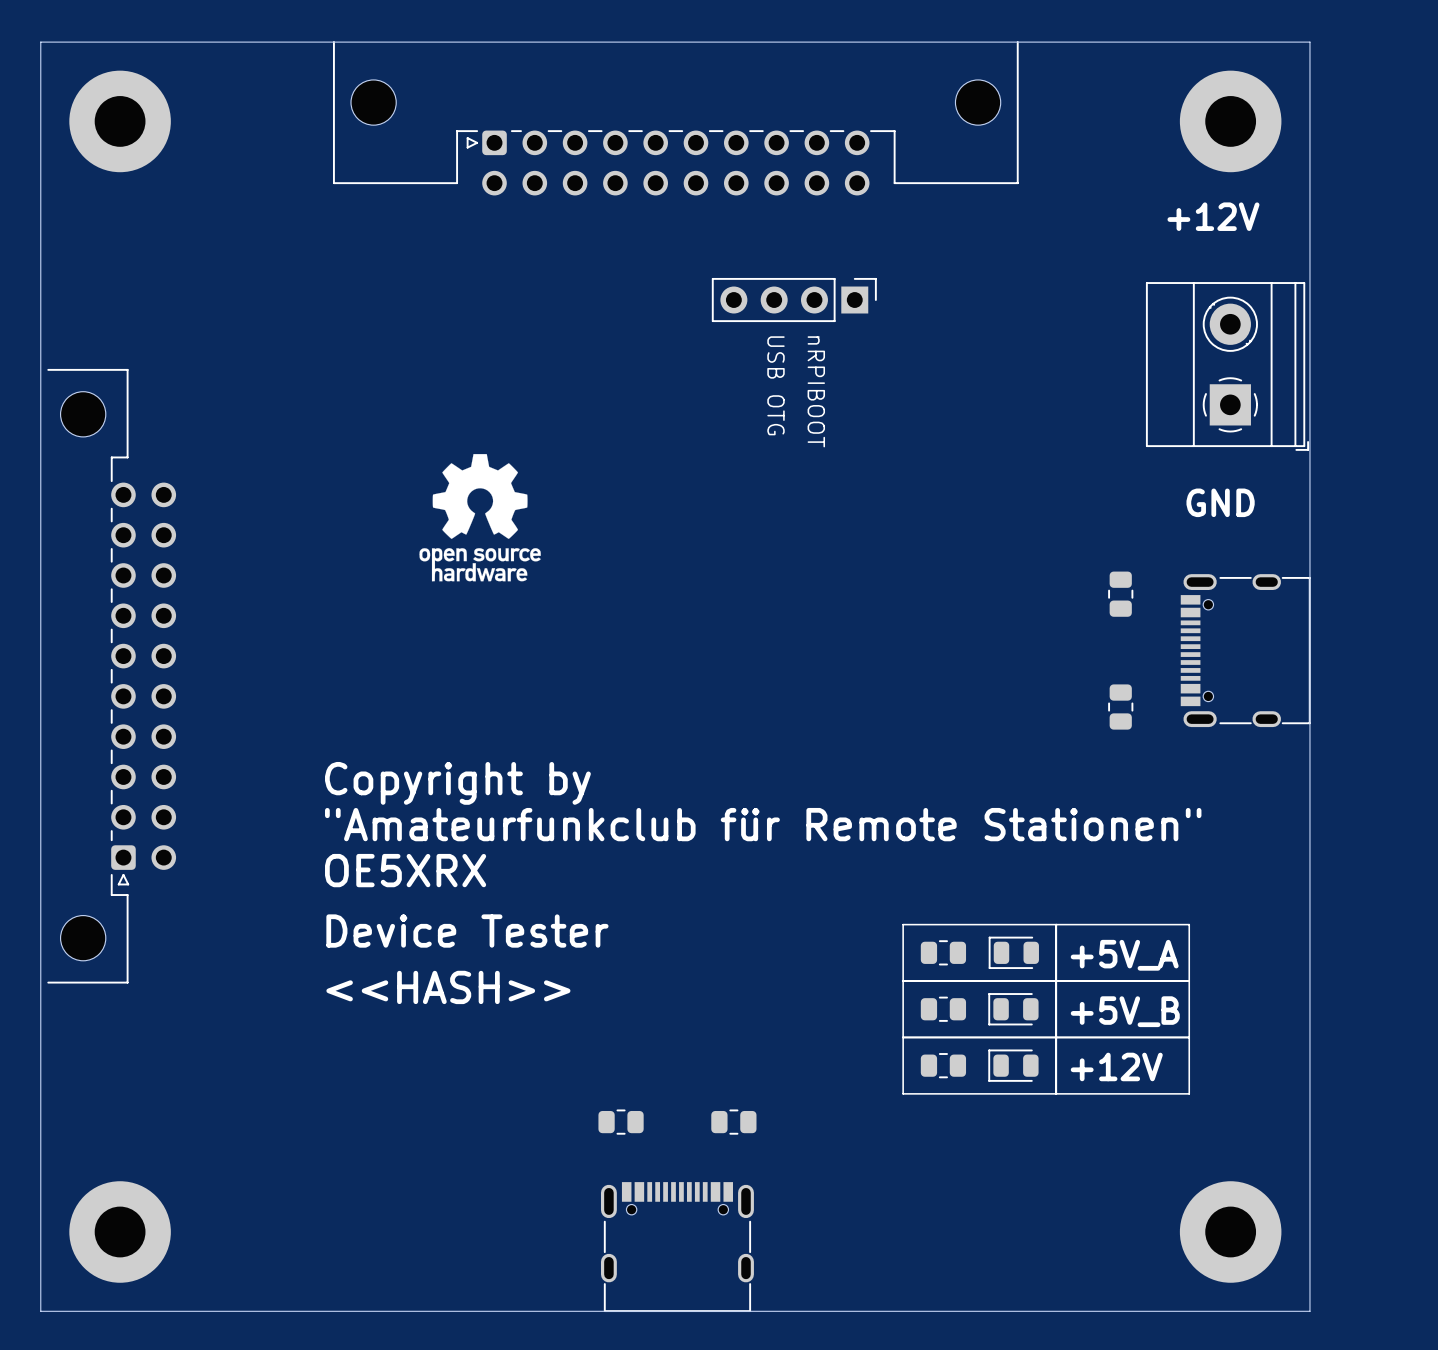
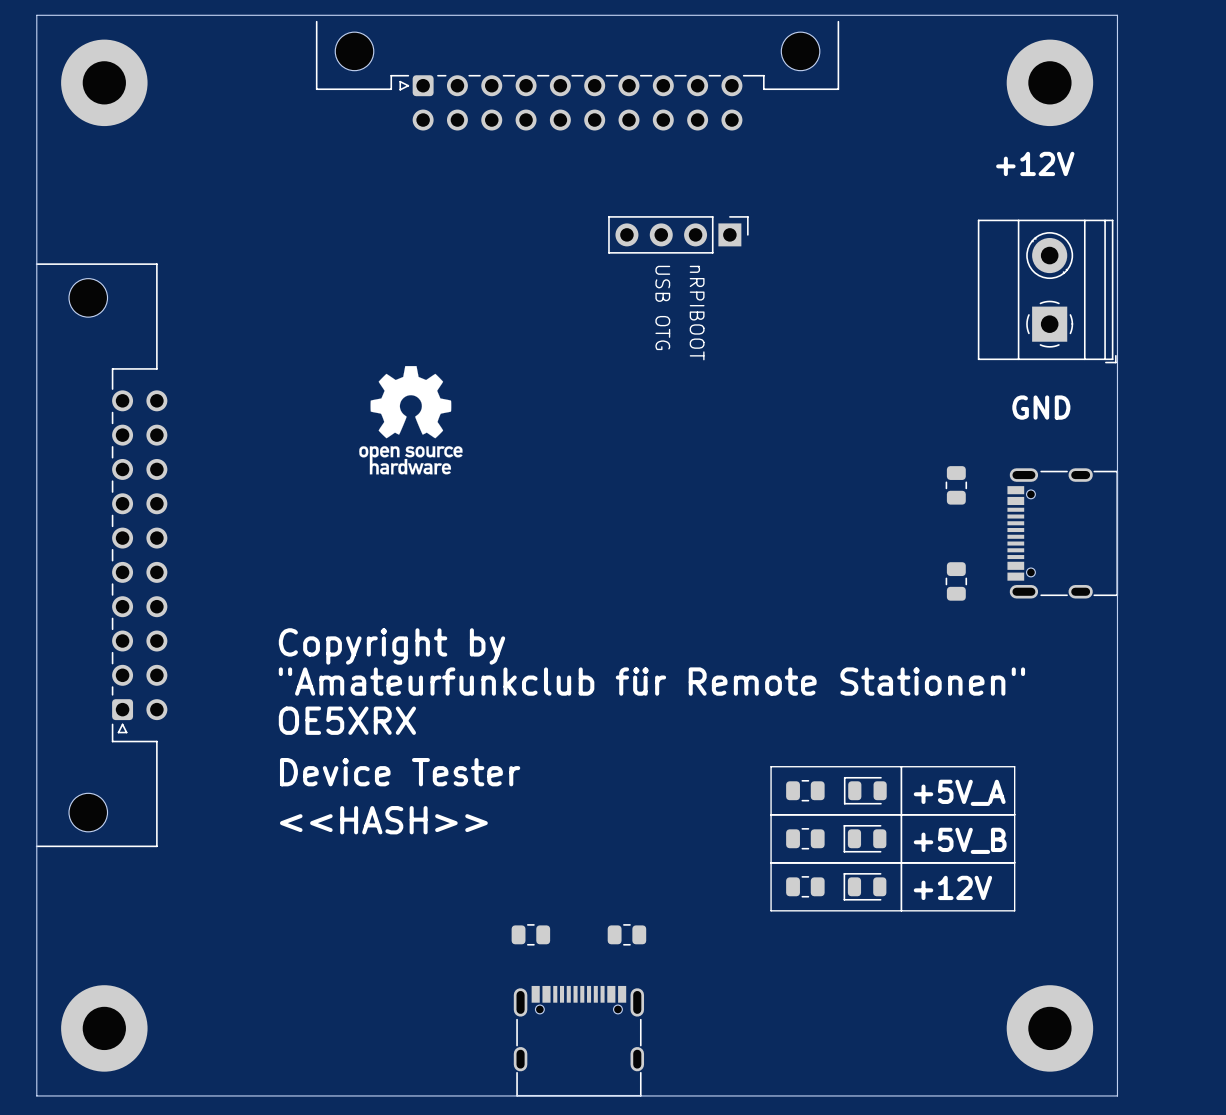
part footprint: [333, 40, 1019, 196] -> [315, 20, 840, 131]
part footprint: [47, 368, 177, 984] -> [35, 263, 168, 848]

